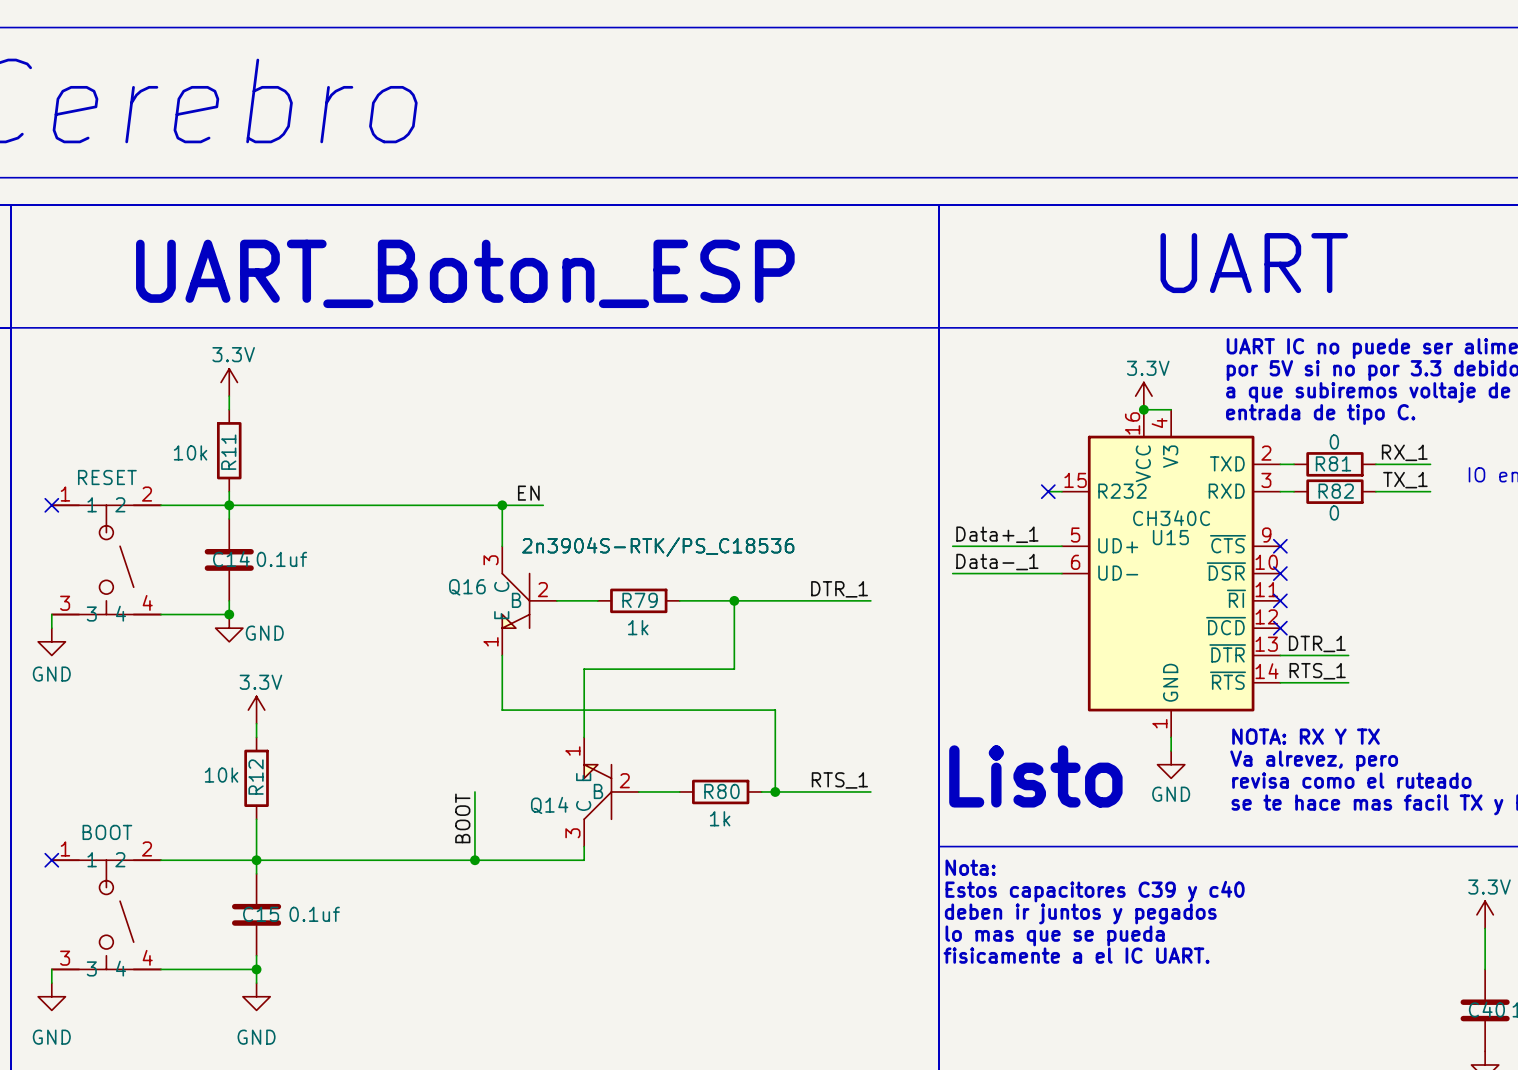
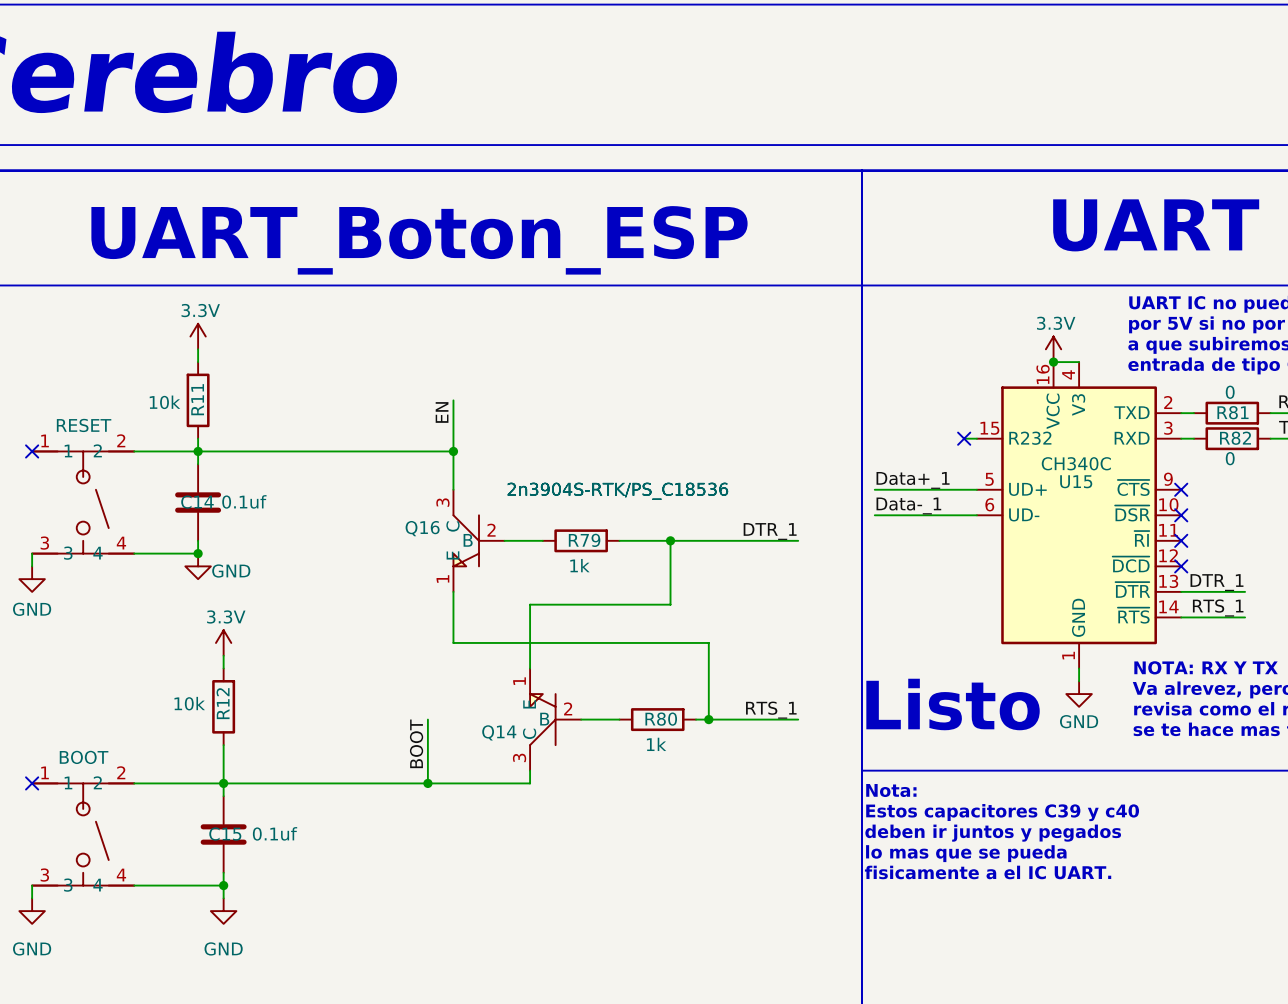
label rotation: 0° (528, 493) -> 90° counterclockwise (442, 412)
label position: EN (528, 493) -> EN (442, 412)
wire: (502, 505) (543, 505) -> (453, 451) (453, 400)

